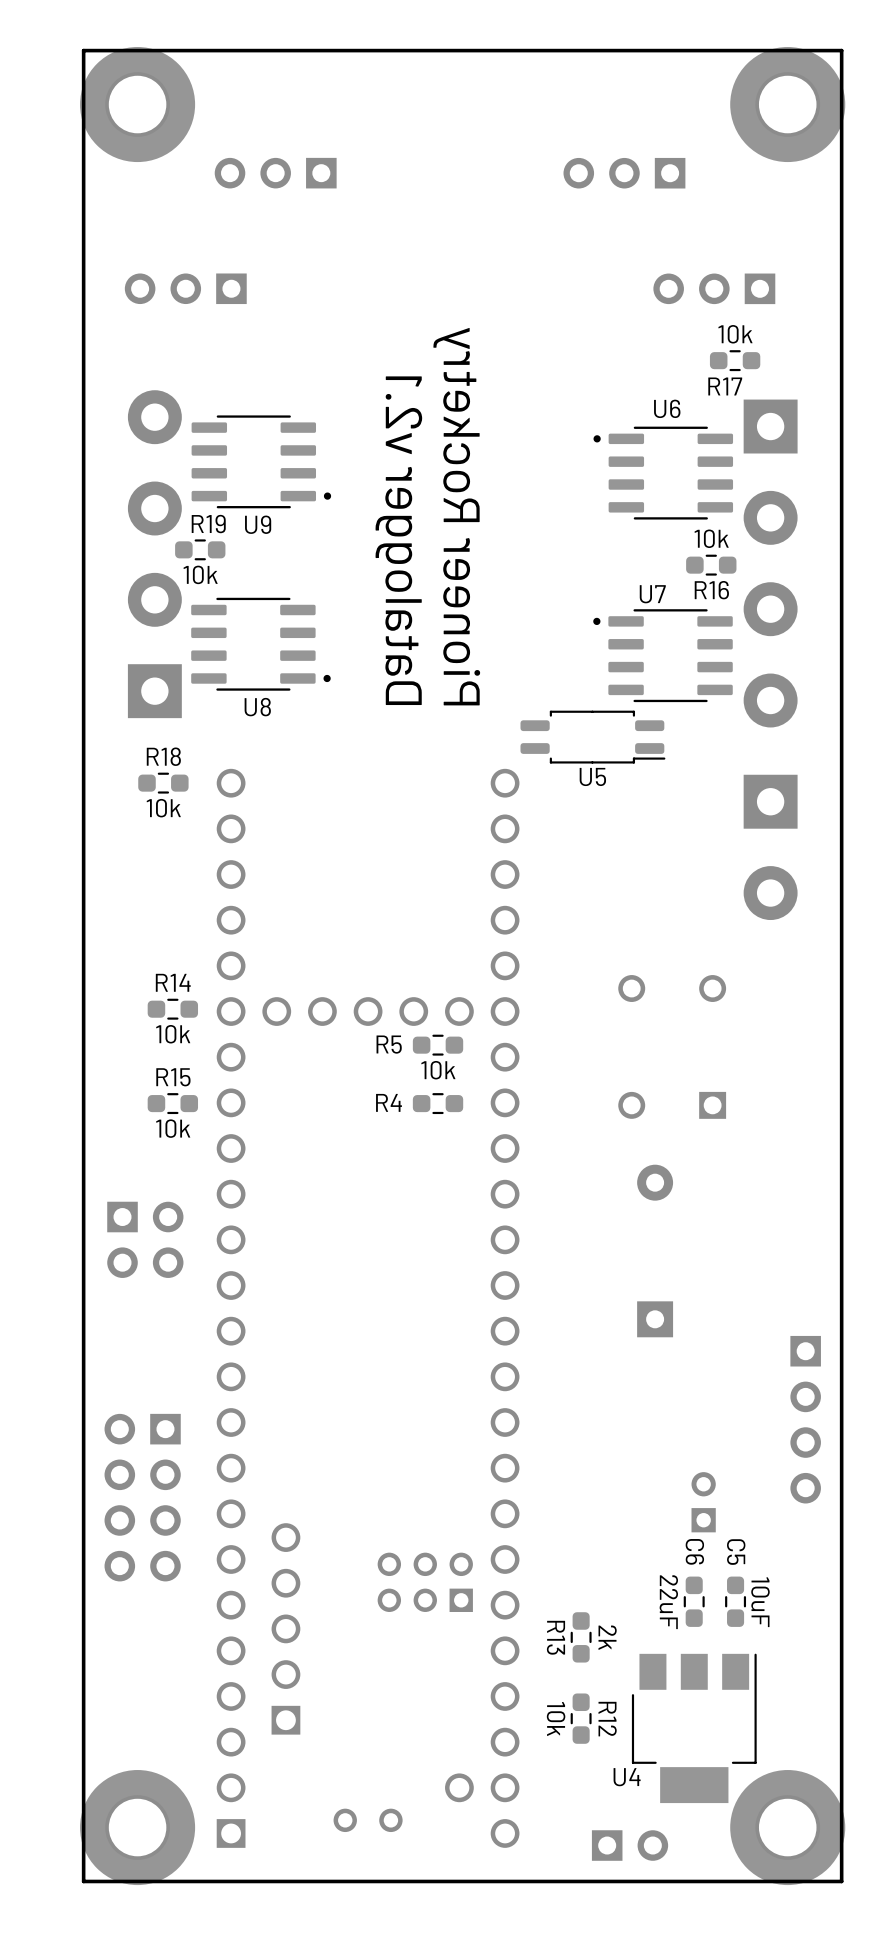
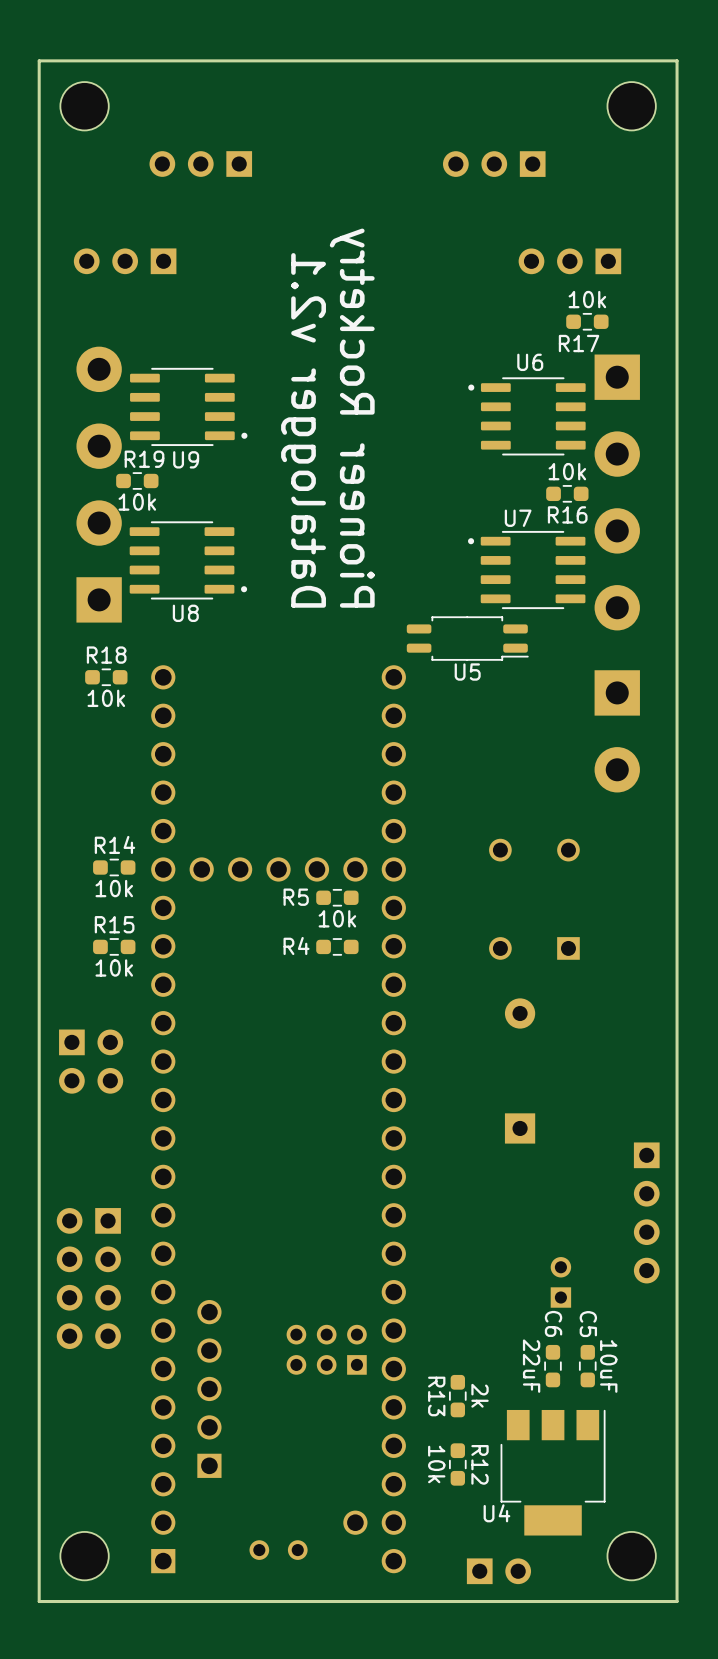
part footprint: [80, 47, 196, 163] -> [60, 82, 109, 131]
part footprint: [730, 47, 846, 163] -> [607, 82, 656, 131]
part footprint: [80, 1770, 196, 1886] -> [60, 1531, 109, 1581]
part footprint: [730, 1770, 846, 1886] -> [607, 1531, 656, 1581]

